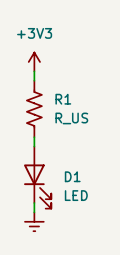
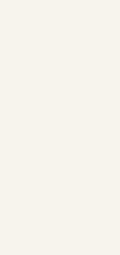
power symbol: +3V3 (34, 61) -> none
wire: (34, 71) (34, 80) -> none
R1: R_US (34, 108) -> none
wire: (34, 137) (34, 146) -> none
D1: LED (37, 177) -> none
wire: (34, 202) (34, 212) -> none
power symbol: (34, 221) -> none

